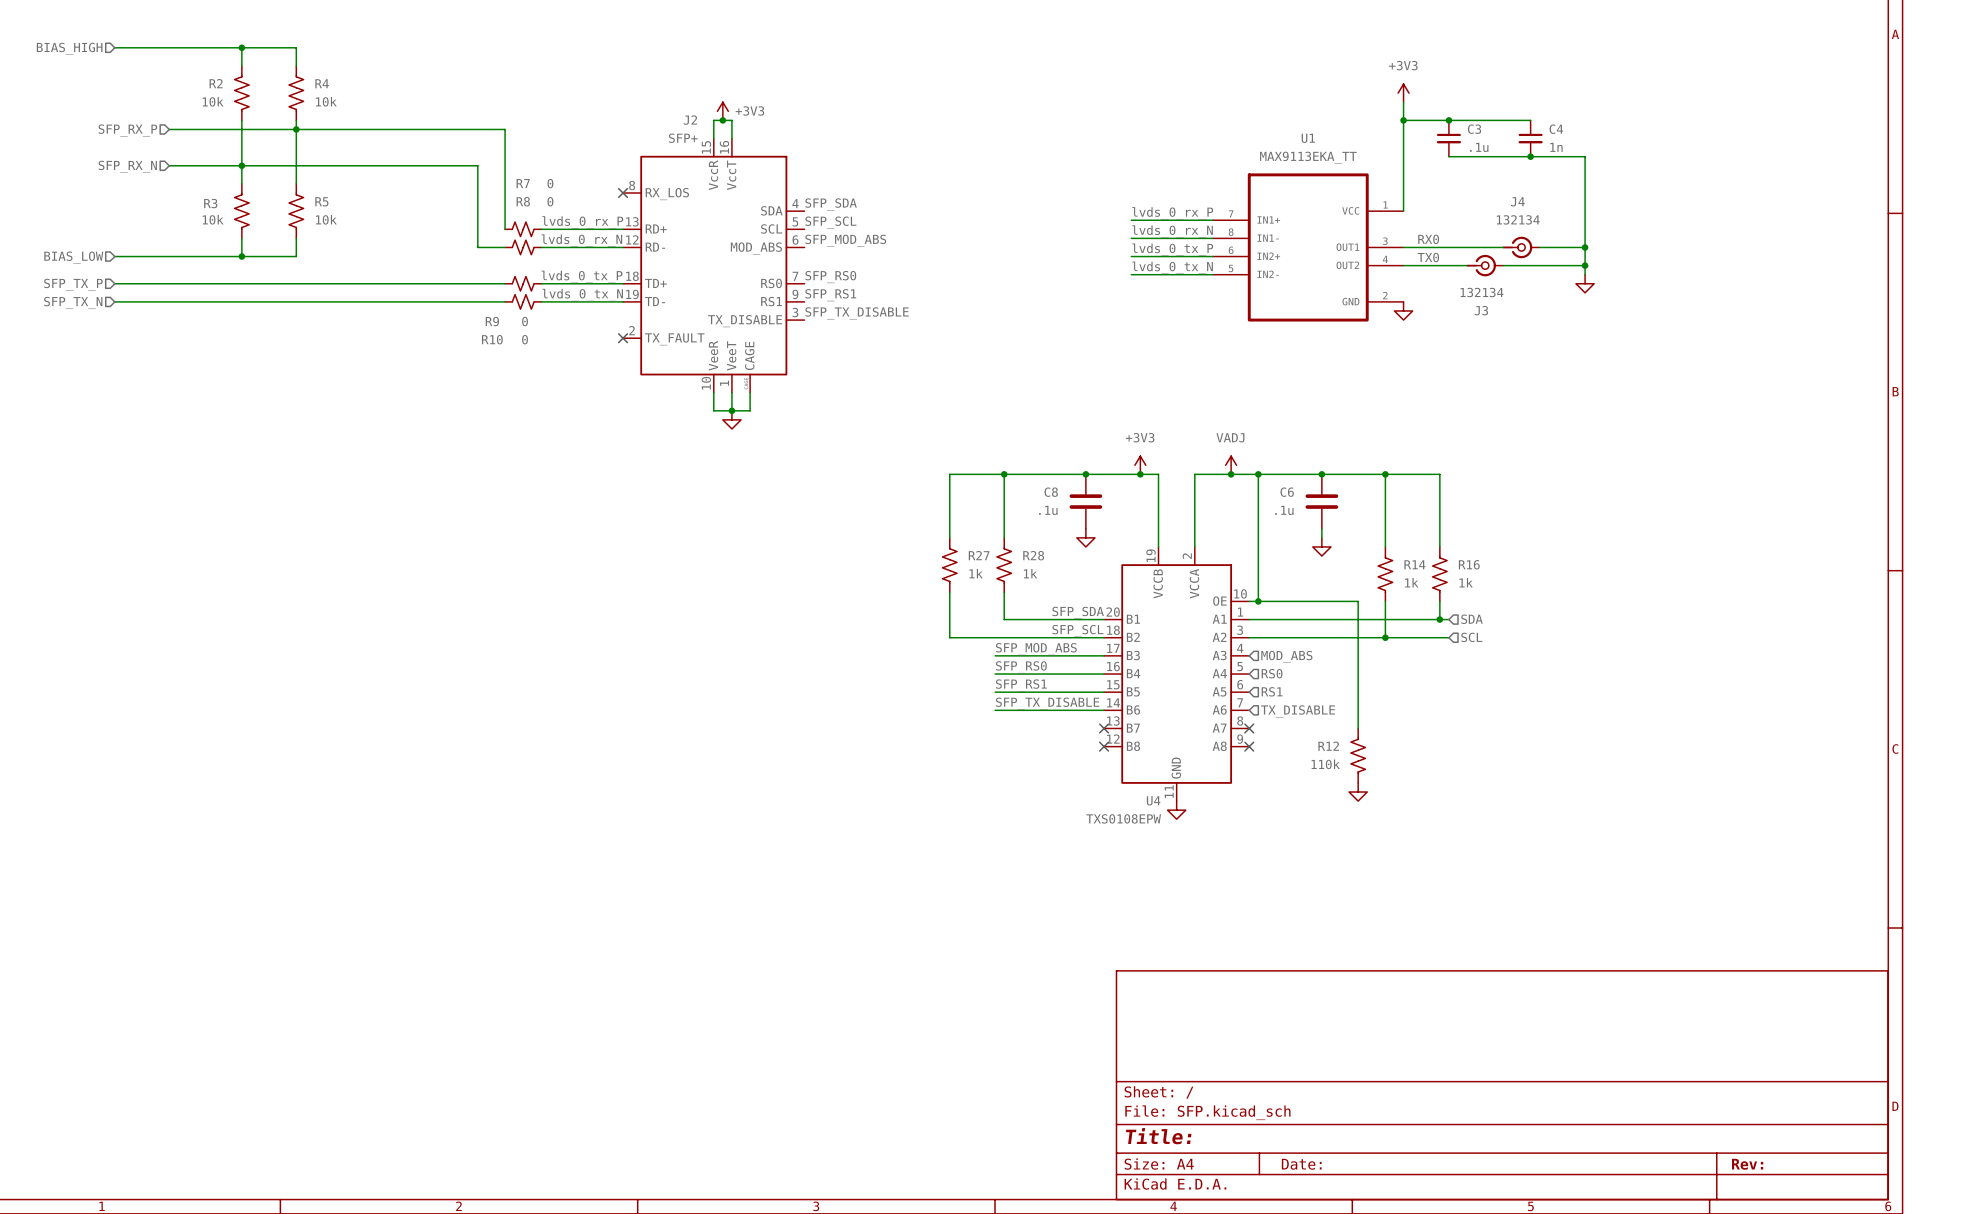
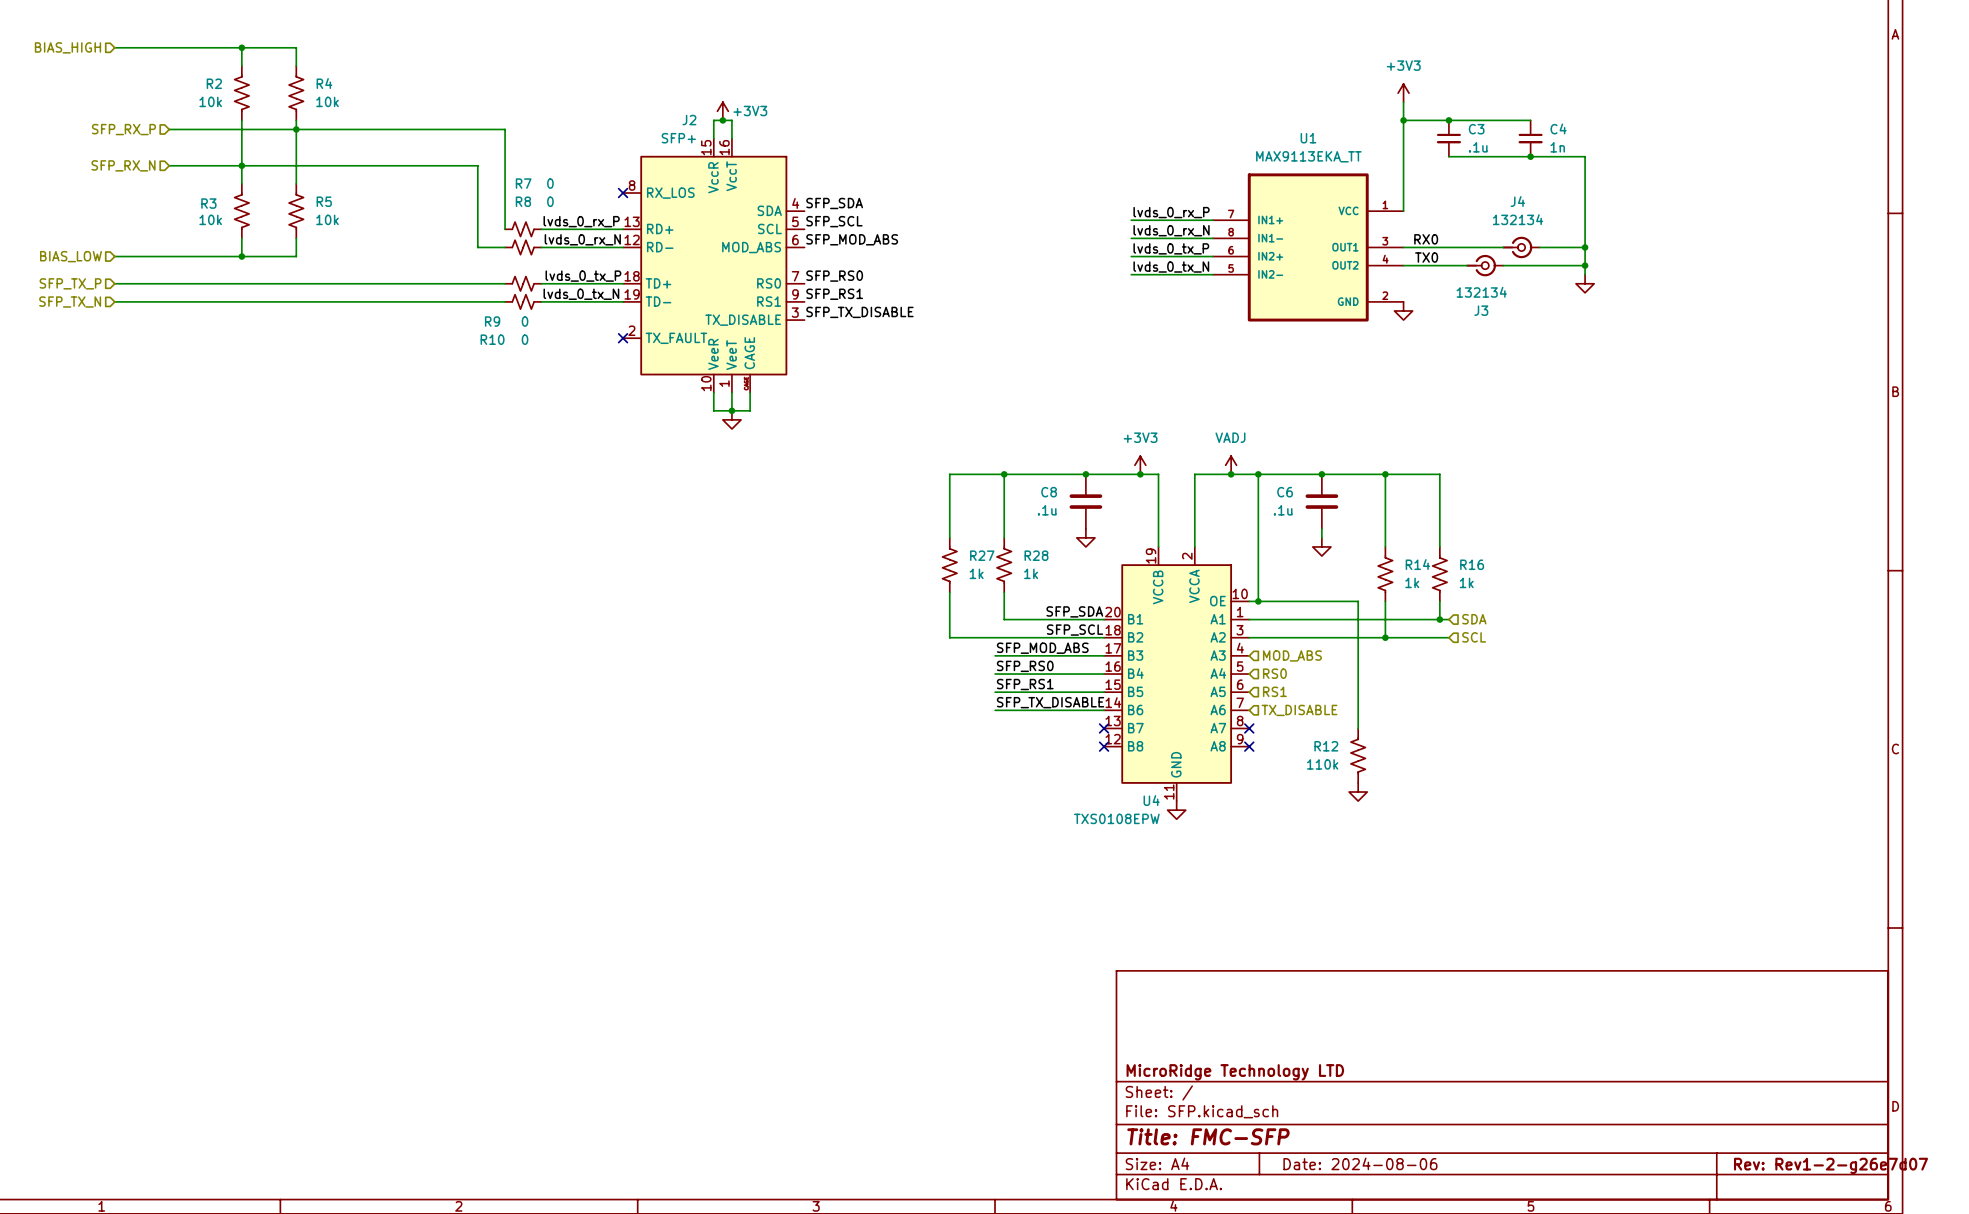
title block: none -> MicroRidge Technology LTD (1235, 1072)
title block: Title: (1158, 1136) -> Title: FMC-SFP (1208, 1136)
title block: Date: (1301, 1164) -> Date: 2024-08-06 (1360, 1163)
title block: Rev: (1747, 1164) -> Rev: Rev1-2-g26e7d07 (1830, 1165)

